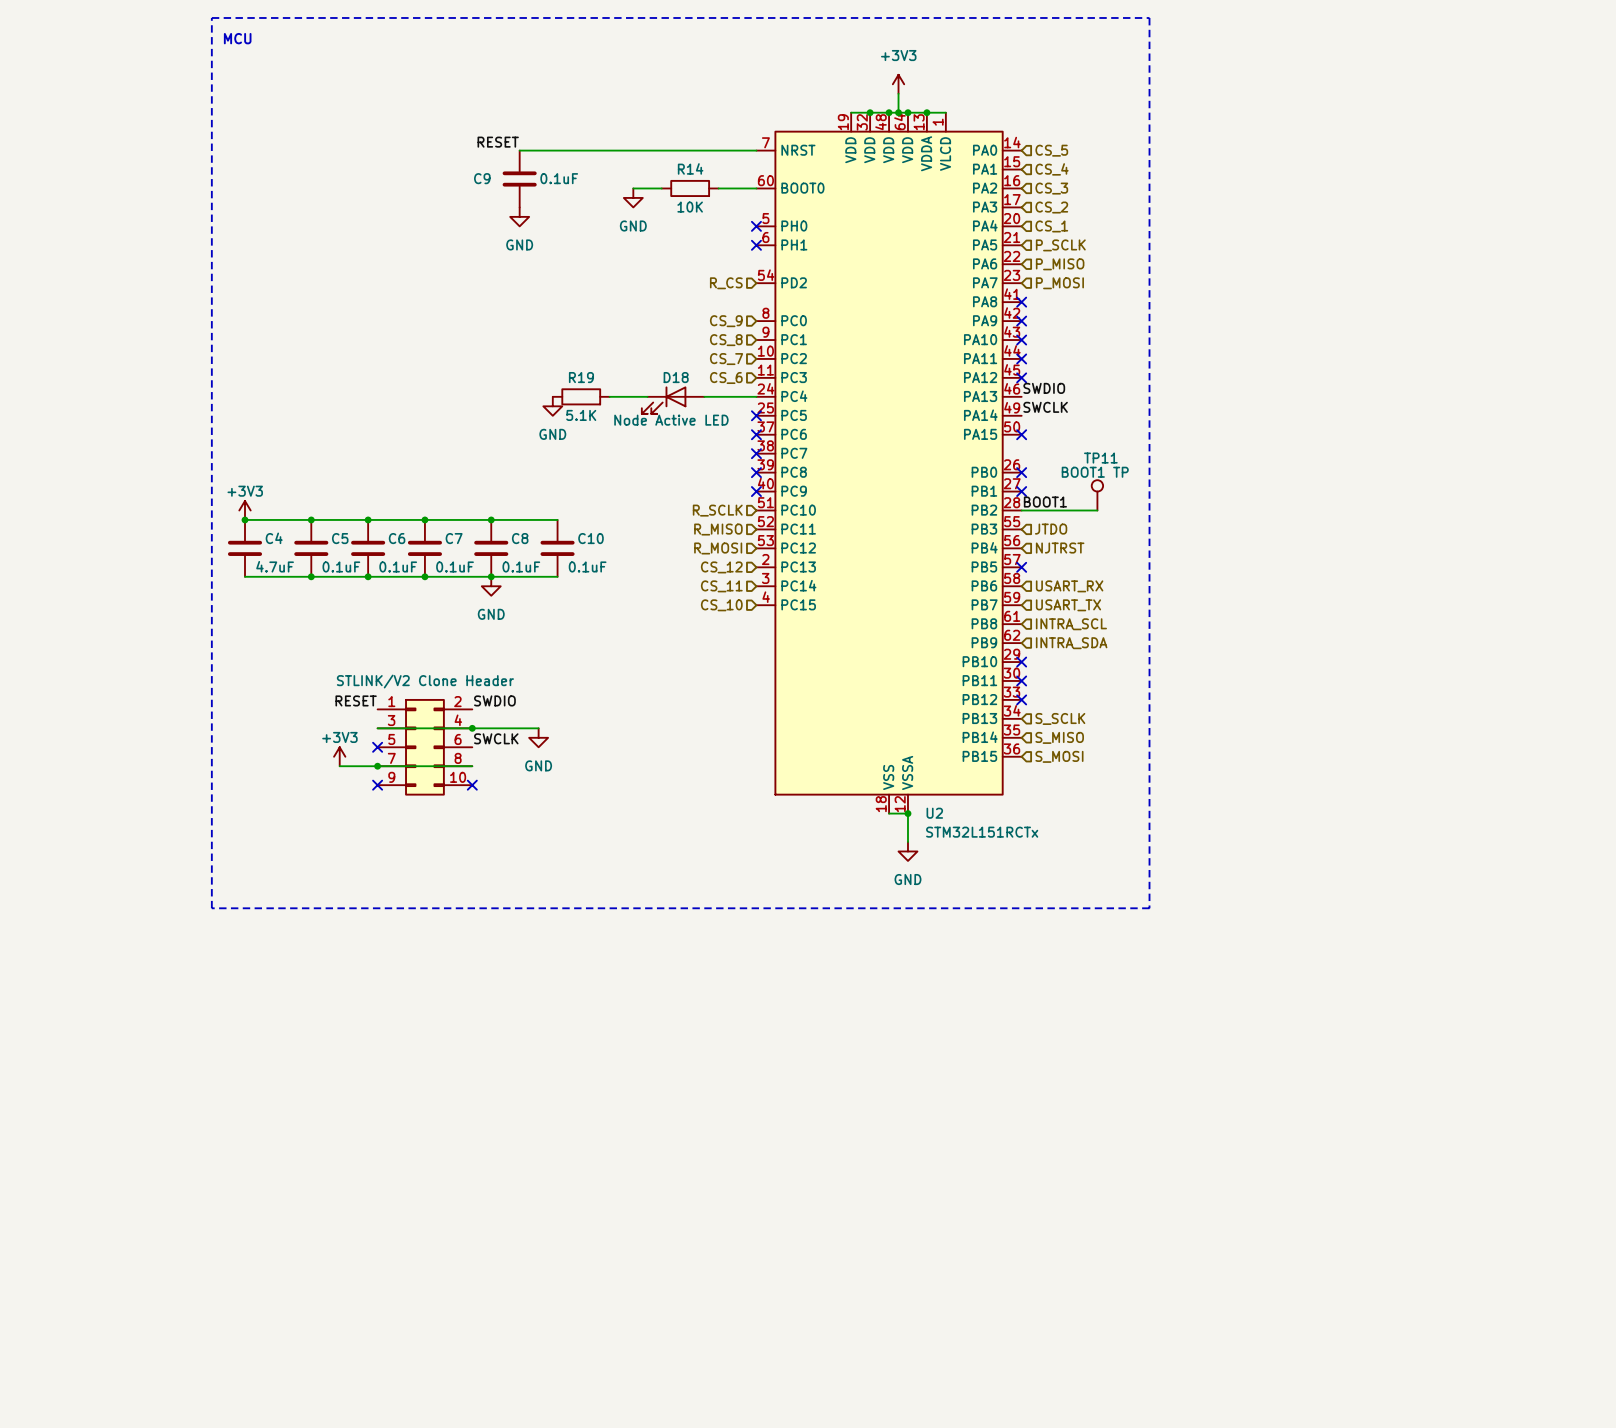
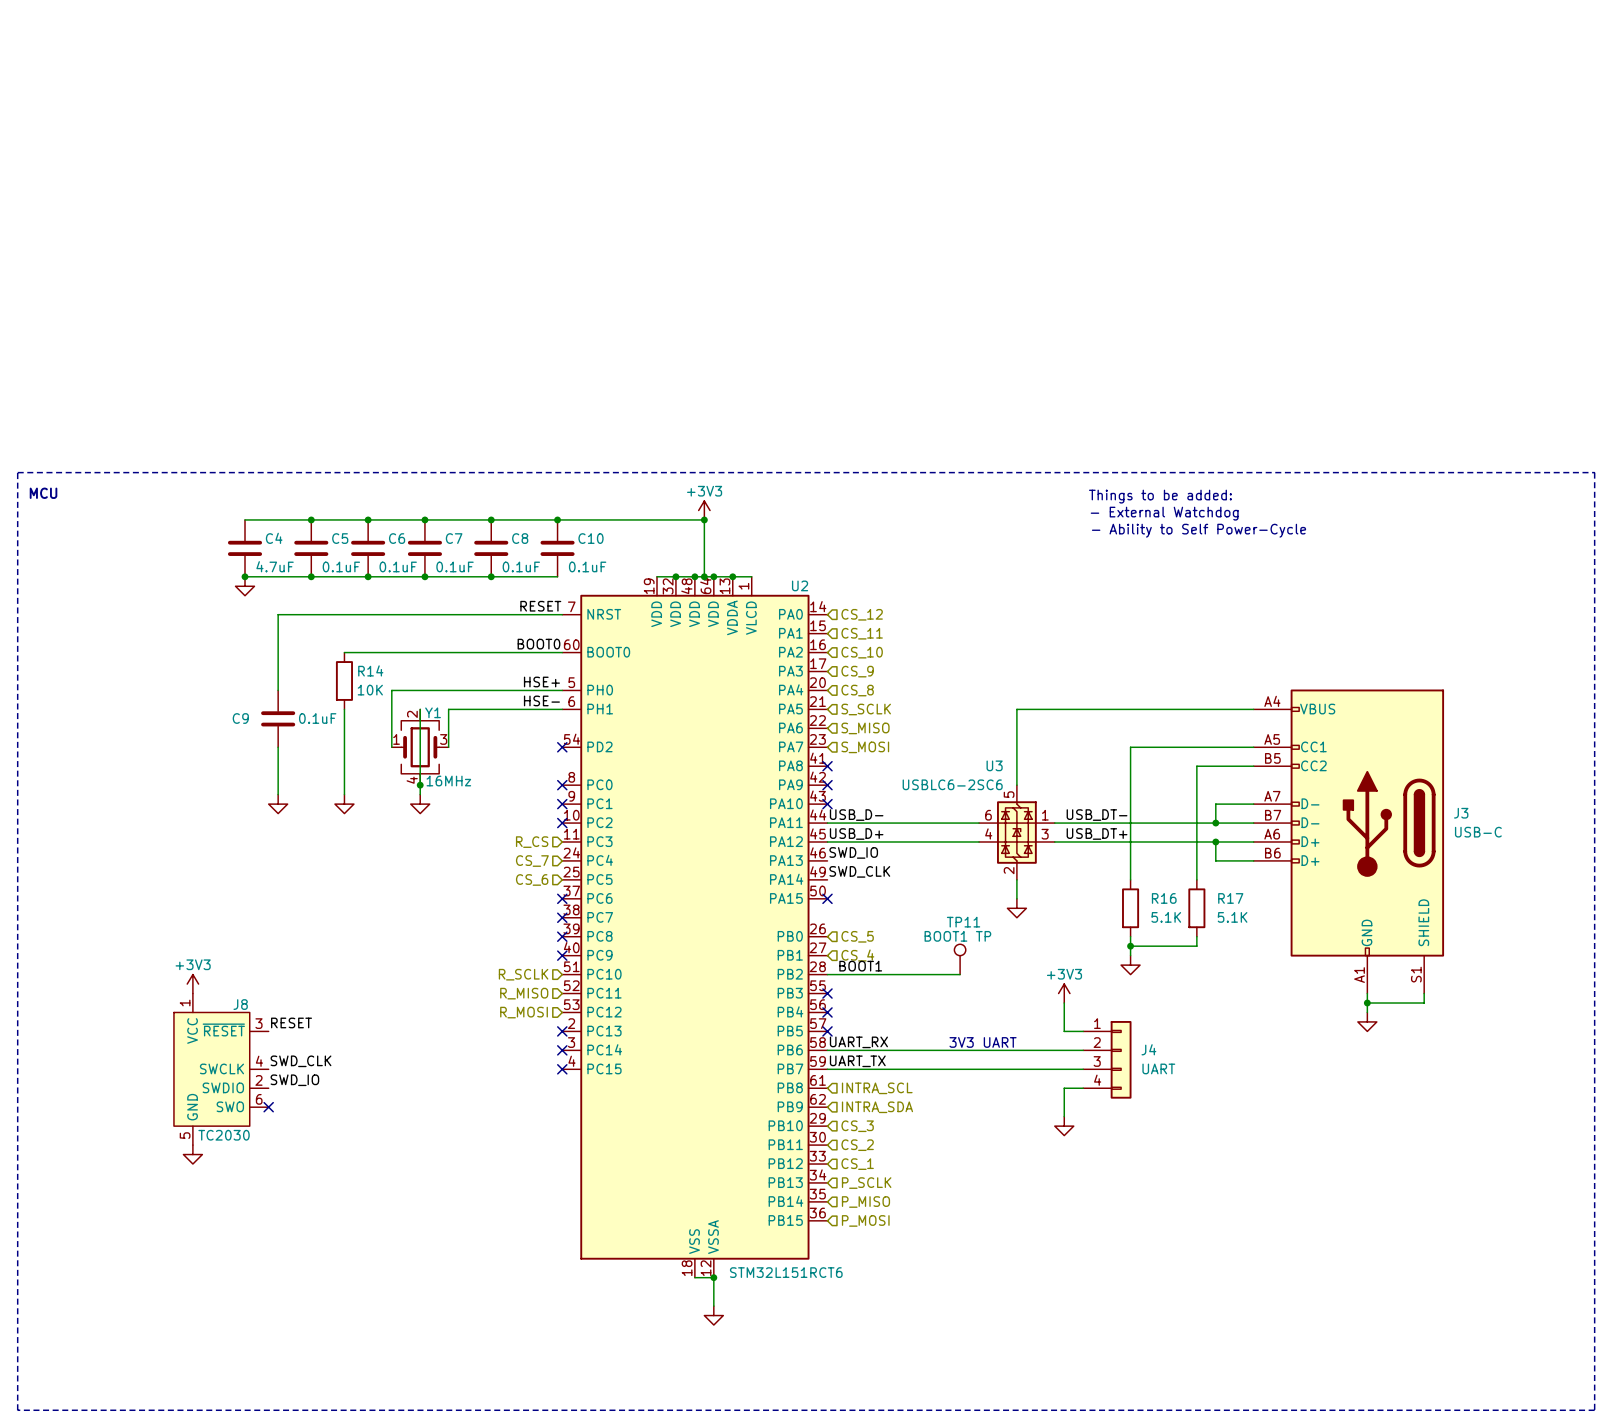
line: (211, 17) (1149, 17) (1149, 908) (211, 908) (211, 17) -> none
text: MCU (237, 38) -> none
power symbol: +3V3 (898, 84) -> none
wire: (898, 93) (898, 112) -> none
wire: (851, 112) (945, 112) -> none
junction: (870, 112) -> none
junction: (889, 112) -> none
junction: (898, 112) -> none
junction: (907, 112) -> none
junction: (926, 112) -> none
label: RESET (498, 142) -> none
wire: (519, 150) (756, 150) -> none
hierarchical label: CS_5 (1051, 150) -> none
hierarchical label: CS_4 (1052, 169) -> none
C9 position: (519, 179) -> (278, 718)
wire: (633, 188) (661, 188) -> none
R14 rotation: 0° (690, 188) -> 90° clockwise (344, 680)
R14 position: (690, 188) -> (344, 680)
wire: (718, 188) (756, 188) -> none
hierarchical label: CS_3 (1051, 188) -> none
power symbol: GND (633, 197) -> none
R14 value position: 10K (690, 207) -> 10K (370, 690)
hierarchical label: CS_2 (1051, 207) -> none
power symbol: GND (519, 216) -> none
no-connect mark: (756, 226) -> none
hierarchical label: CS_1 (1051, 226) -> none
no-connect mark: (756, 245) -> none
hierarchical label: P_SCLK (1060, 245) -> none
hierarchical label: P_MISO (1060, 264) -> none
hierarchical label: R_CS (726, 283) -> none
hierarchical label: P_MOSI (1059, 283) -> none
no-connect mark: (1021, 302) -> none
hierarchical label: CS_9 (726, 321) -> none
no-connect mark: (1021, 321) -> none
hierarchical label: CS_8 (726, 340) -> none
no-connect mark: (1021, 340) -> none
no-connect mark: (1021, 358) -> none
hierarchical label: CS_7 (726, 359) -> none
no-connect mark: (1021, 377) -> none
hierarchical label: CS_6 (726, 378) -> none
label: SWDIO (1044, 388) -> none
R19: 5.1K (581, 396) -> none
wire: (609, 396) (647, 396) -> none
wire: (704, 396) (756, 396) -> none
D18: Node Active LED (673, 400) -> none
power symbol: GND (552, 406) -> none
label: SWCLK (1045, 407) -> none
no-connect mark: (756, 415) -> none
no-connect mark: (756, 434) -> none
no-connect mark: (1021, 434) -> none
no-connect mark: (756, 453) -> none
U2 position: (889, 463) -> (694, 927)
line: none -> (17, 472) (1594, 472) (1594, 1410) (17, 1410) (17, 472)
no-connect mark: (756, 472) -> none
no-connect mark: (1021, 472) -> none
no-connect mark: (756, 491) -> none
no-connect mark: (1021, 491) -> none
text: none -> MCU (43, 493)
TP11 position: (1097, 495) -> (960, 959)
text: none -> Things to be added: (1160, 496)
label: BOOT1 (1045, 502) -> none
power symbol: +3V3 (245, 510) -> none
power symbol: none -> +3V3 (704, 510)
hierarchical label: R_SCLK (717, 510) -> none
wire: (1021, 510) (1097, 510) -> none
text: none -> - External Watchdog (1164, 513)
junction: (245, 519) -> none
wire: none -> (557, 519) (704, 519) (704, 576)
junction: none -> (557, 519)
junction: none -> (704, 519)
hierarchical label: R_MISO (718, 529) -> none
hierarchical label: JTDO (1051, 529) -> none
text: none -> - Ability to Self Power-Cycle (1198, 530)
hierarchical label: R_MOSI (718, 548) -> none
hierarchical label: NJTRST (1060, 548) -> none
hierarchical label rotation: 0° (721, 567) -> 180° (862, 614)
hierarchical label position: CS_12 (721, 567) -> CS_12 (862, 614)
no-connect mark: (1021, 567) -> none
junction: none -> (245, 576)
wire: none -> (657, 576) (751, 576)
junction: none -> (675, 576)
junction: none -> (694, 576)
junction: none -> (704, 576)
junction: none -> (713, 576)
junction: none -> (732, 576)
power symbol: none -> (245, 586)
power symbol: GND (491, 586) -> none
hierarchical label rotation: 0° (721, 586) -> 180° (862, 633)
hierarchical label position: CS_11 (721, 586) -> CS_11 (862, 633)
hierarchical label: USART_RX (1069, 586) -> none
hierarchical label rotation: 0° (721, 605) -> 180° (862, 652)
hierarchical label position: CS_10 (721, 605) -> CS_10 (862, 652)
hierarchical label: USART_TX (1068, 605) -> none
label: none -> RESET (540, 606)
wire: none -> (562, 614) (278, 614) (278, 690)
hierarchical label: INTRA_SCL (1071, 624) -> none
hierarchical label: INTRA_SDA (1071, 643) -> none
label: none -> BOOT0 (538, 644)
wire: none -> (344, 652) (562, 652)
no-connect mark: (1021, 662) -> none
hierarchical label: none -> CS_9 (857, 671)
no-connect mark: (1021, 680) -> none
label: none -> HSE+ (541, 682)
wire: none -> (562, 690) (391, 690) (391, 747)
hierarchical label: none -> CS_8 (857, 690)
no-connect mark: (1021, 699) -> none
label: RESET (356, 700) -> none
label: SWDIO (494, 700) -> none
label: none -> HSE- (541, 700)
wire: none -> (344, 709) (344, 794)
wire: none -> (562, 709) (448, 709) (448, 747)
hierarchical label: none -> S_SCLK (866, 709)
wire: none -> (1253, 709) (1016, 709) (1016, 785)
hierarchical label: S_SCLK (1060, 718) -> none
wire: (377, 728) (538, 728) -> none
junction: (472, 728) -> none
hierarchical label: none -> S_MISO (865, 728)
power symbol: GND (538, 737) -> none
hierarchical label: S_MISO (1059, 737) -> none
label: SWCLK (496, 738) -> none
wire: none -> (278, 747) (278, 794)
no-connect mark: (377, 747) -> none
Y1: none -> 16MHz (420, 747)
part: STLINK/V2 Clone Header (424, 747) -> none
no-connect mark: none -> (562, 747)
hierarchical label: none -> S_MOSI (865, 747)
wire: none -> (1253, 747) (1130, 747) (1130, 879)
power symbol: +3V3 (339, 756) -> none
hierarchical label: S_MOSI (1059, 756) -> none
wire: (339, 766) (472, 766) -> none
junction: (377, 766) -> none
no-connect mark: none -> (827, 766)
wire: none -> (1253, 766) (1196, 766) (1196, 879)
no-connect mark: (377, 785) -> none
junction: none -> (420, 785)
no-connect mark: (472, 785) -> none
no-connect mark: none -> (562, 785)
no-connect mark: none -> (827, 785)
power symbol: none -> (278, 804)
power symbol: none -> (344, 804)
power symbol: none -> (420, 804)
no-connect mark: none -> (562, 804)
no-connect mark: none -> (827, 804)
wire: none -> (1253, 804) (1215, 804) (1215, 823)
wire: (889, 813) (907, 813) (907, 841) -> none
junction: (907, 813) -> none
U2 name position: U2 (934, 813) -> U2 (800, 585)
label: none -> USB_D- (856, 815)
label: none -> USB_DT- (1097, 815)
no-connect mark: none -> (562, 823)
wire: none -> (827, 823) (979, 823)
wire: none -> (1054, 823) (1253, 823)
junction: none -> (1215, 823)
U2 value: STM32L151RCTx (982, 832) -> STM32L151RCT6 (786, 1272)
U3: none -> USBLC6-2SC6 (1016, 832)
label: none -> USB_D+ (856, 833)
label: none -> USB_DT+ (1097, 833)
wire: none -> (827, 841) (979, 841)
wire: none -> (1054, 841) (1253, 841)
wire: none -> (1215, 841) (1215, 860) (1253, 860)
junction: none -> (1215, 841)
J3: none -> USB-C (1348, 841)
hierarchical label: none -> R_CS (532, 842)
power symbol: GND (907, 851) -> none
label: none -> SWD_IO (853, 852)
hierarchical label: none -> CS_7 (532, 861)
label: none -> SWD_CLK (859, 871)
hierarchical label: none -> CS_6 (532, 879)
wire: none -> (1016, 879) (1016, 898)
no-connect mark: none -> (562, 898)
no-connect mark: none -> (827, 898)
power symbol: none -> (1016, 908)
R16: none -> 5.1K (1130, 908)
R17: none -> 5.1K (1196, 908)
no-connect mark: none -> (562, 917)
no-connect mark: none -> (562, 936)
hierarchical label: none -> CS_5 (857, 936)
wire: none -> (1130, 936) (1130, 955)
wire: none -> (1196, 936) (1196, 946) (1130, 946)
junction: none -> (1130, 946)
no-connect mark: none -> (562, 955)
hierarchical label: none -> CS_4 (857, 955)
power symbol: none -> (1130, 965)
label: none -> BOOT1 (860, 966)
hierarchical label: none -> R_SCLK (523, 974)
wire: none -> (827, 974) (960, 974)
power symbol: none -> +3V3 (192, 984)
hierarchical label: none -> R_MISO (524, 993)
no-connect mark: none -> (827, 993)
power symbol: none -> +3V3 (1064, 993)
wire: none -> (1367, 993) (1367, 1012)
wire: none -> (1424, 993) (1424, 1003) (1367, 1003)
wire: none -> (1064, 1003) (1064, 1031) (1083, 1031)
junction: none -> (1367, 1003)
hierarchical label: none -> R_MOSI (524, 1012)
no-connect mark: none -> (827, 1012)
power symbol: none -> (1367, 1021)
label: none -> RESET (291, 1022)
no-connect mark: none -> (562, 1031)
no-connect mark: none -> (827, 1031)
label: none -> UART_RX (858, 1042)
text: none -> 3V3 UART (983, 1042)
no-connect mark: none -> (562, 1050)
wire: none -> (827, 1050) (1083, 1050)
J4: none -> UART (1107, 1059)
label: none -> SWD_CLK (301, 1061)
label: none -> UART_TX (857, 1061)
J8: none -> TC2030 (221, 1069)
no-connect mark: none -> (562, 1069)
wire: none -> (827, 1069) (1083, 1069)
label: none -> SWD_IO (294, 1080)
hierarchical label: none -> INTRA_SCL (877, 1088)
wire: none -> (1083, 1088) (1064, 1088) (1064, 1116)
no-connect mark: none -> (268, 1107)
hierarchical label: none -> INTRA_SDA (877, 1107)
hierarchical label: none -> CS_3 (857, 1126)
power symbol: none -> (1064, 1126)
hierarchical label: none -> CS_2 (857, 1145)
power symbol: none -> (192, 1154)
hierarchical label: none -> CS_1 (857, 1164)
hierarchical label: none -> P_SCLK (866, 1183)
hierarchical label: none -> P_MISO (865, 1202)
hierarchical label: none -> P_MOSI (865, 1220)
wire: none -> (694, 1277) (713, 1277) (713, 1306)
junction: none -> (713, 1277)
power symbol: none -> (713, 1315)

